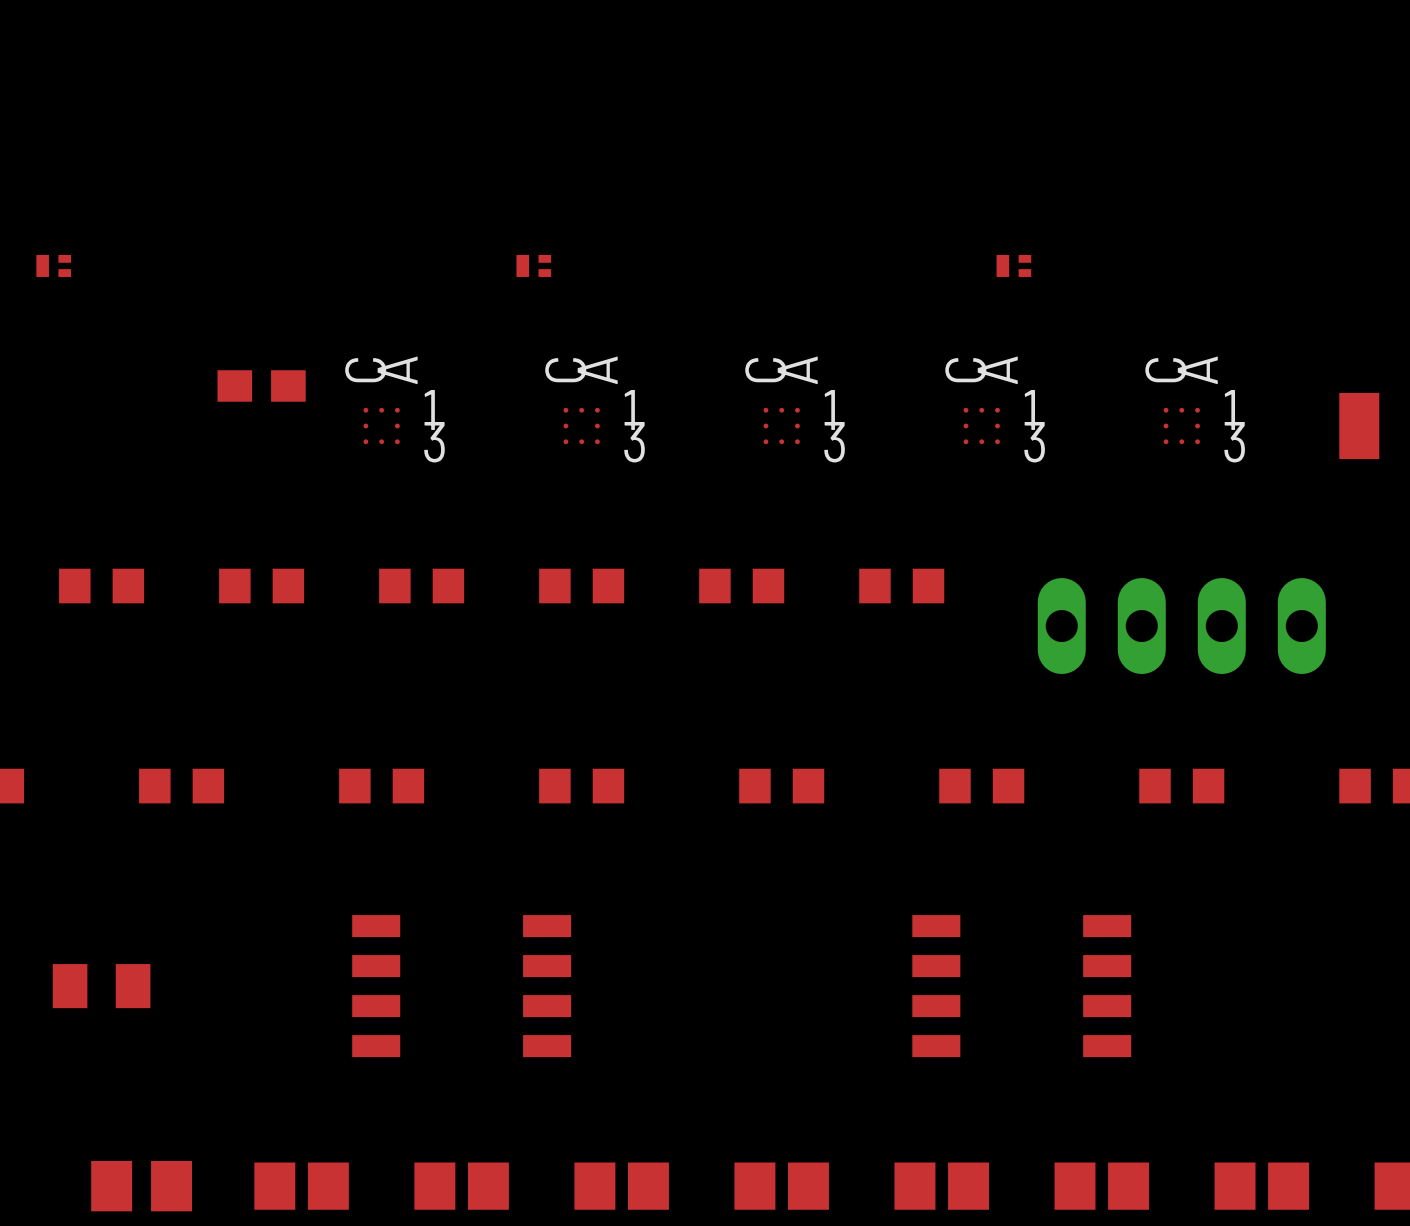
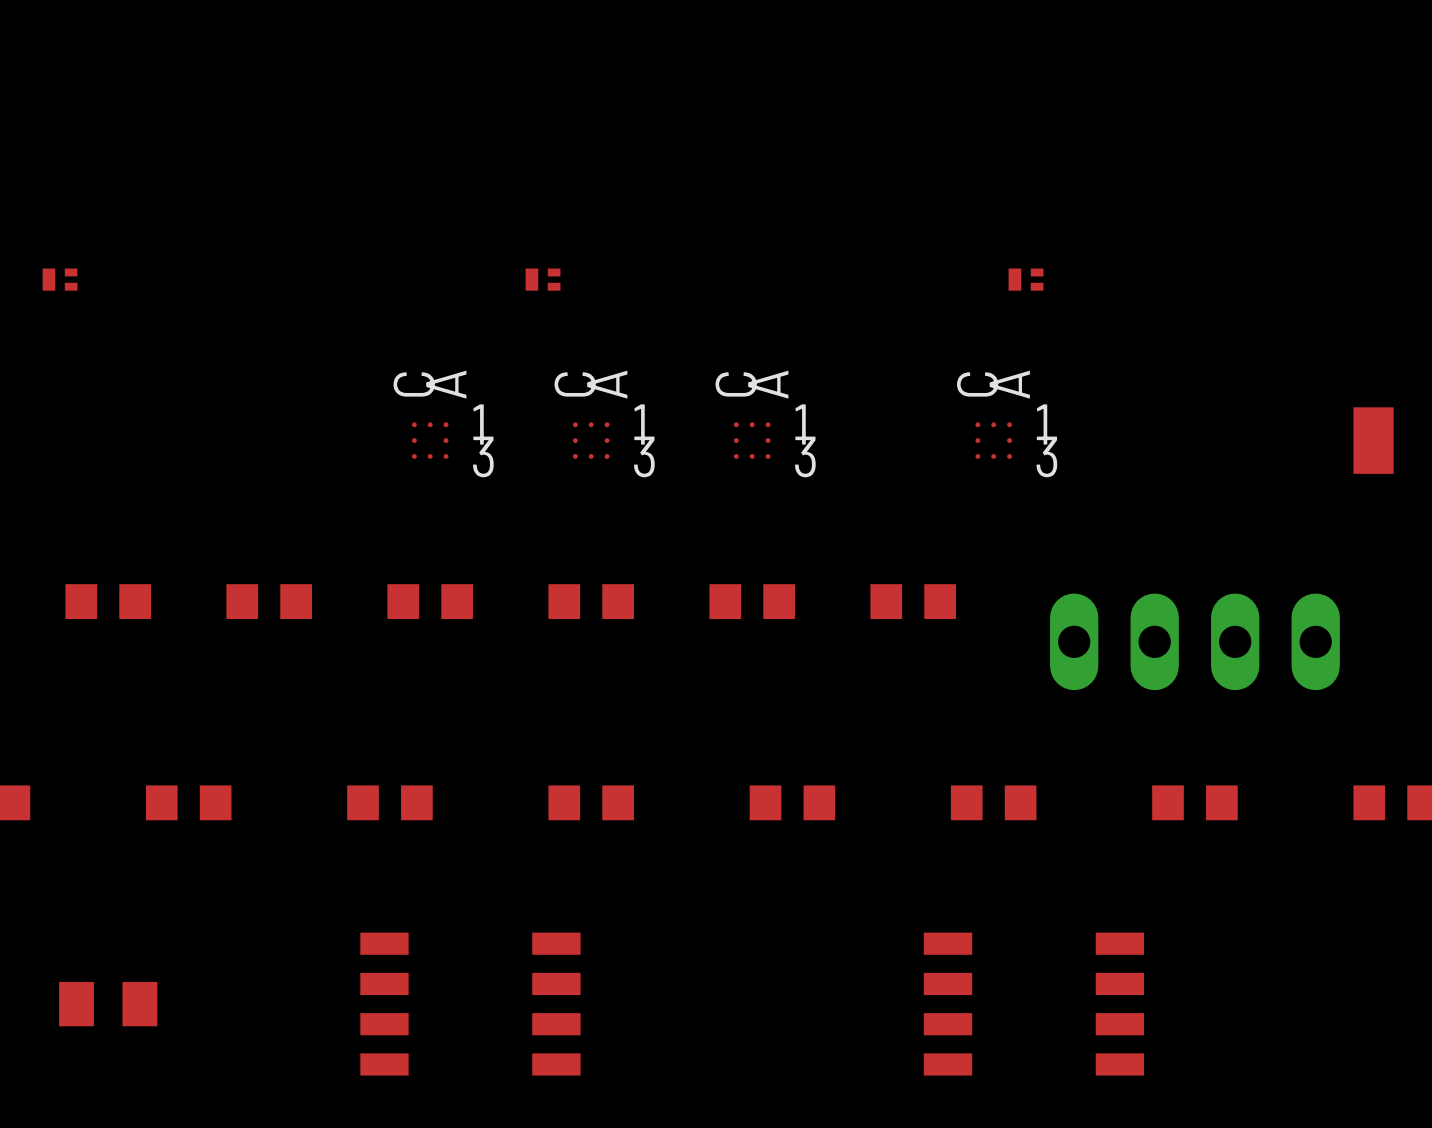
part: (261, 385) -> none
part position: (381, 425) -> (430, 440)
part position: (781, 425) -> (752, 440)
part: (1181, 425) -> none

